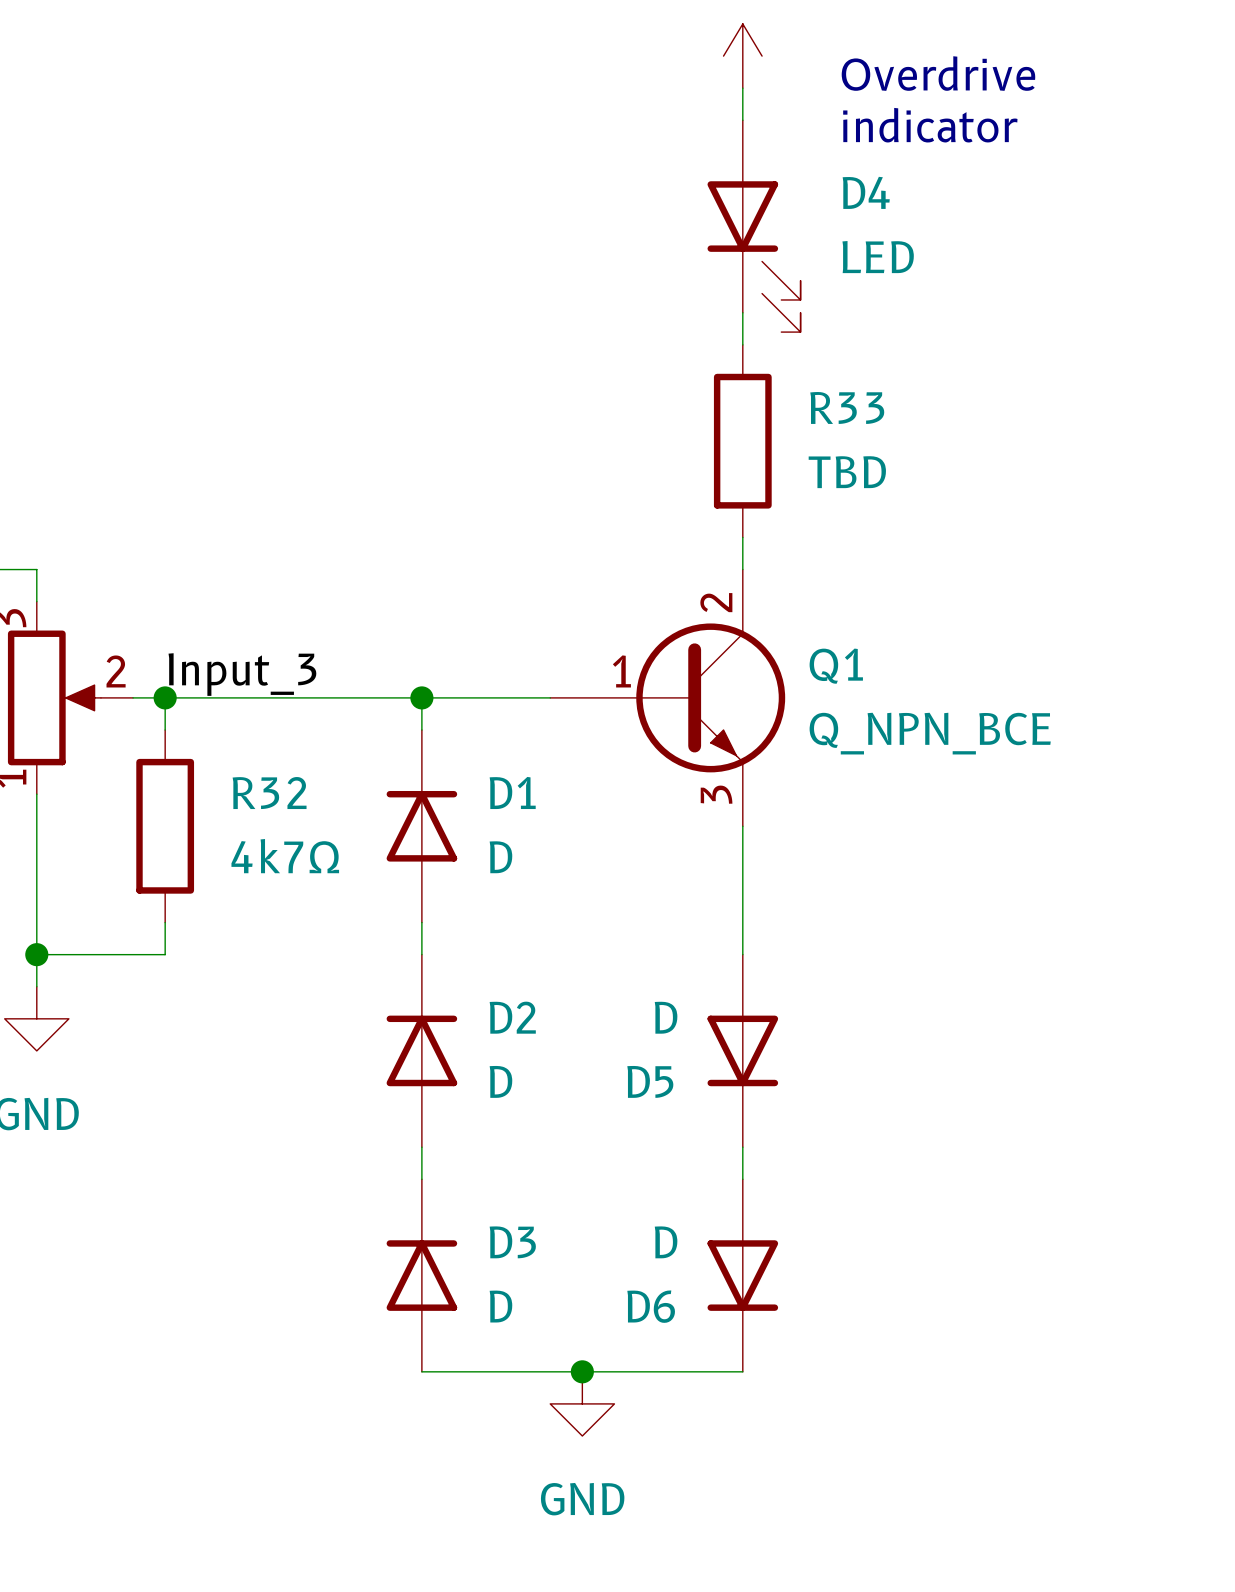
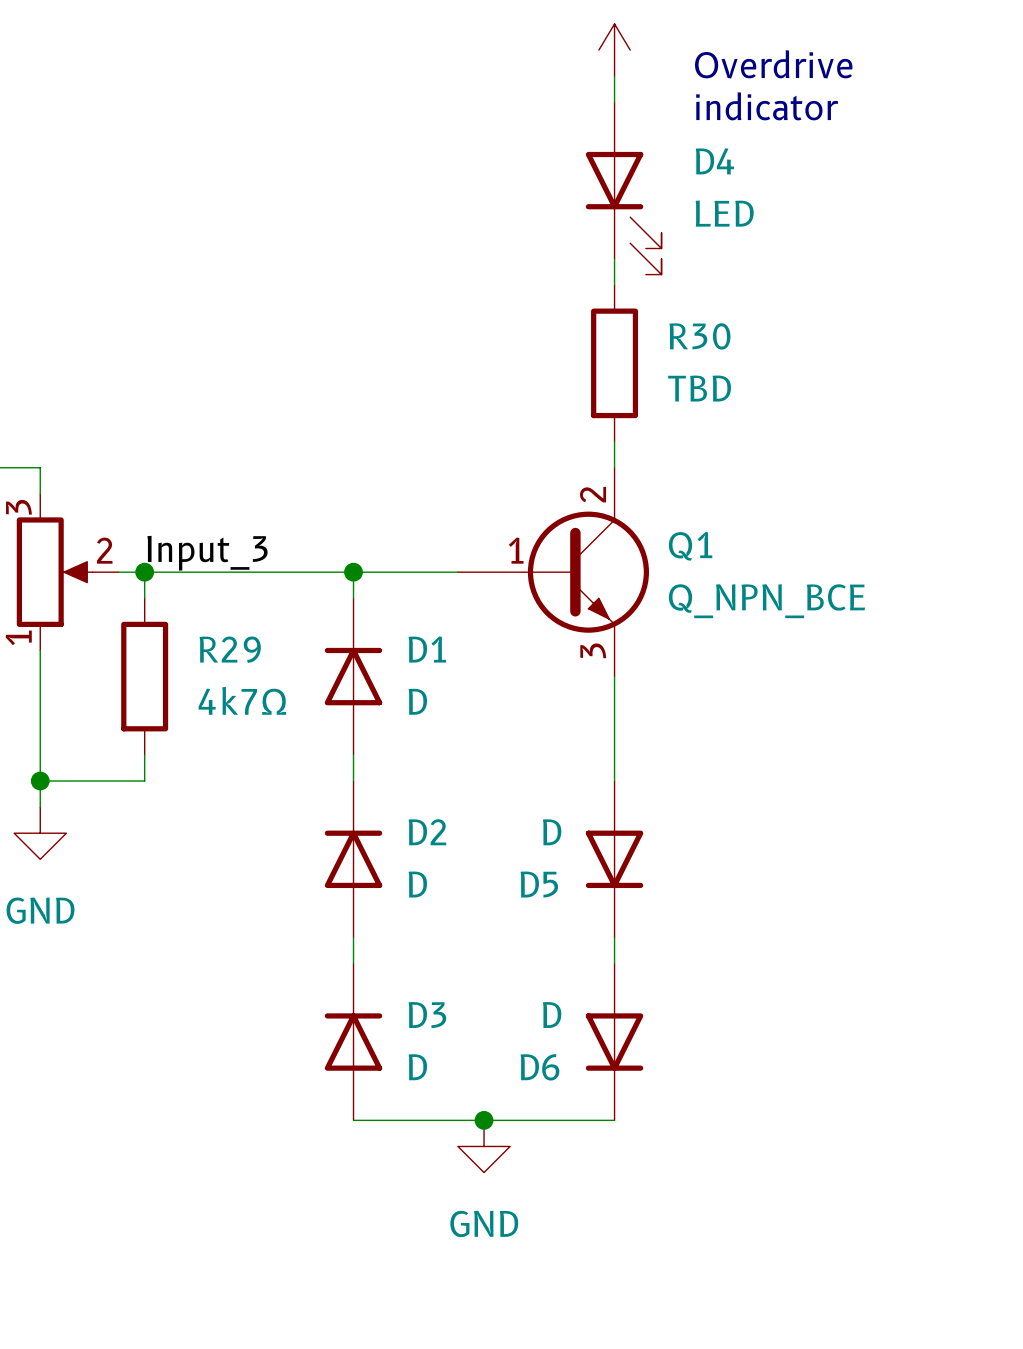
R33 name: R33 (847, 407) -> R30 (699, 336)
R32 name: R32 (269, 793) -> R29 (230, 649)

